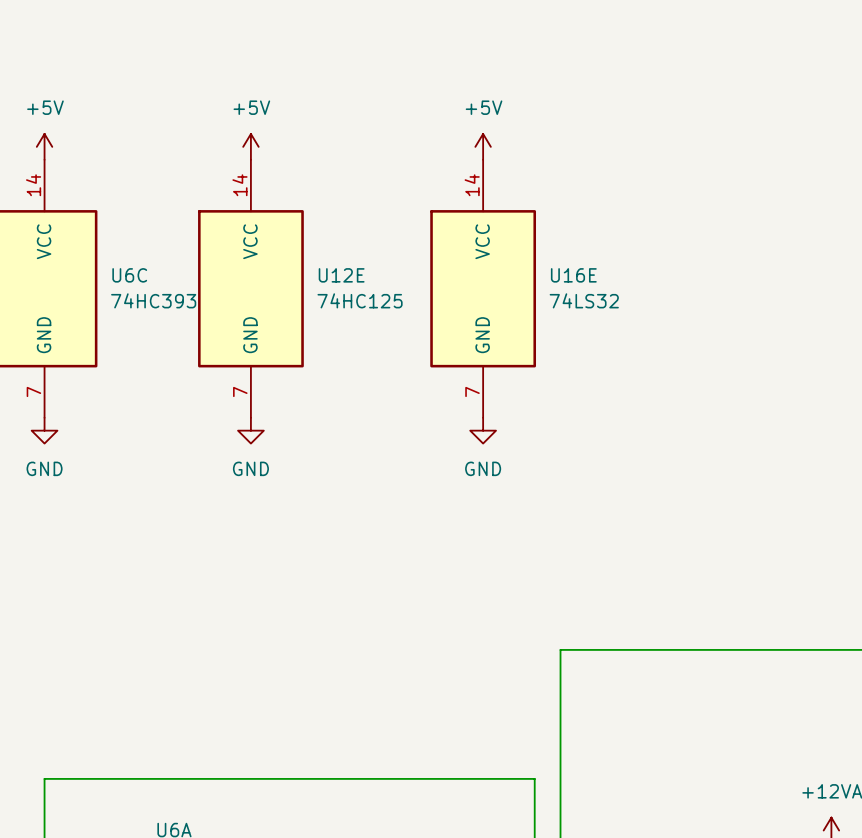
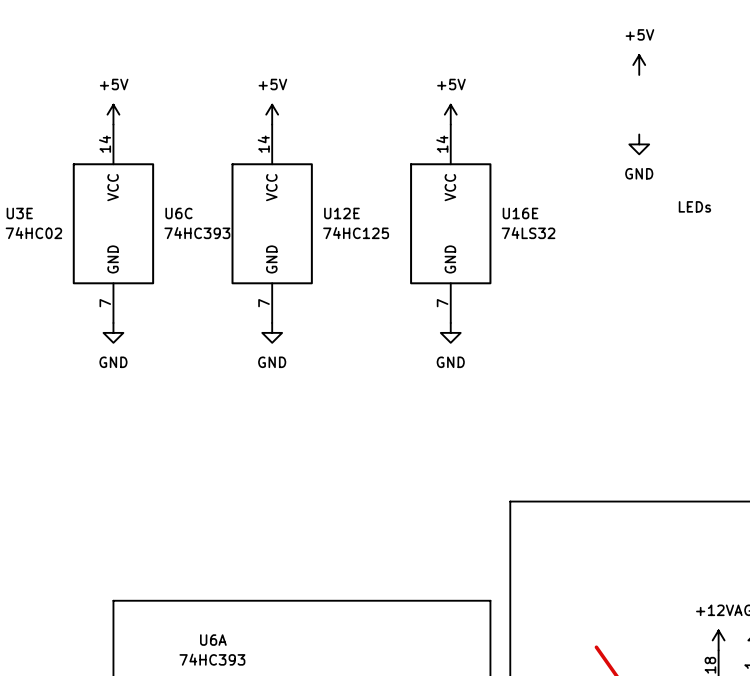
power symbol: none -> +5V (639, 65)
power symbol: none -> GND (639, 144)
text: none -> LEDs (694, 206)

